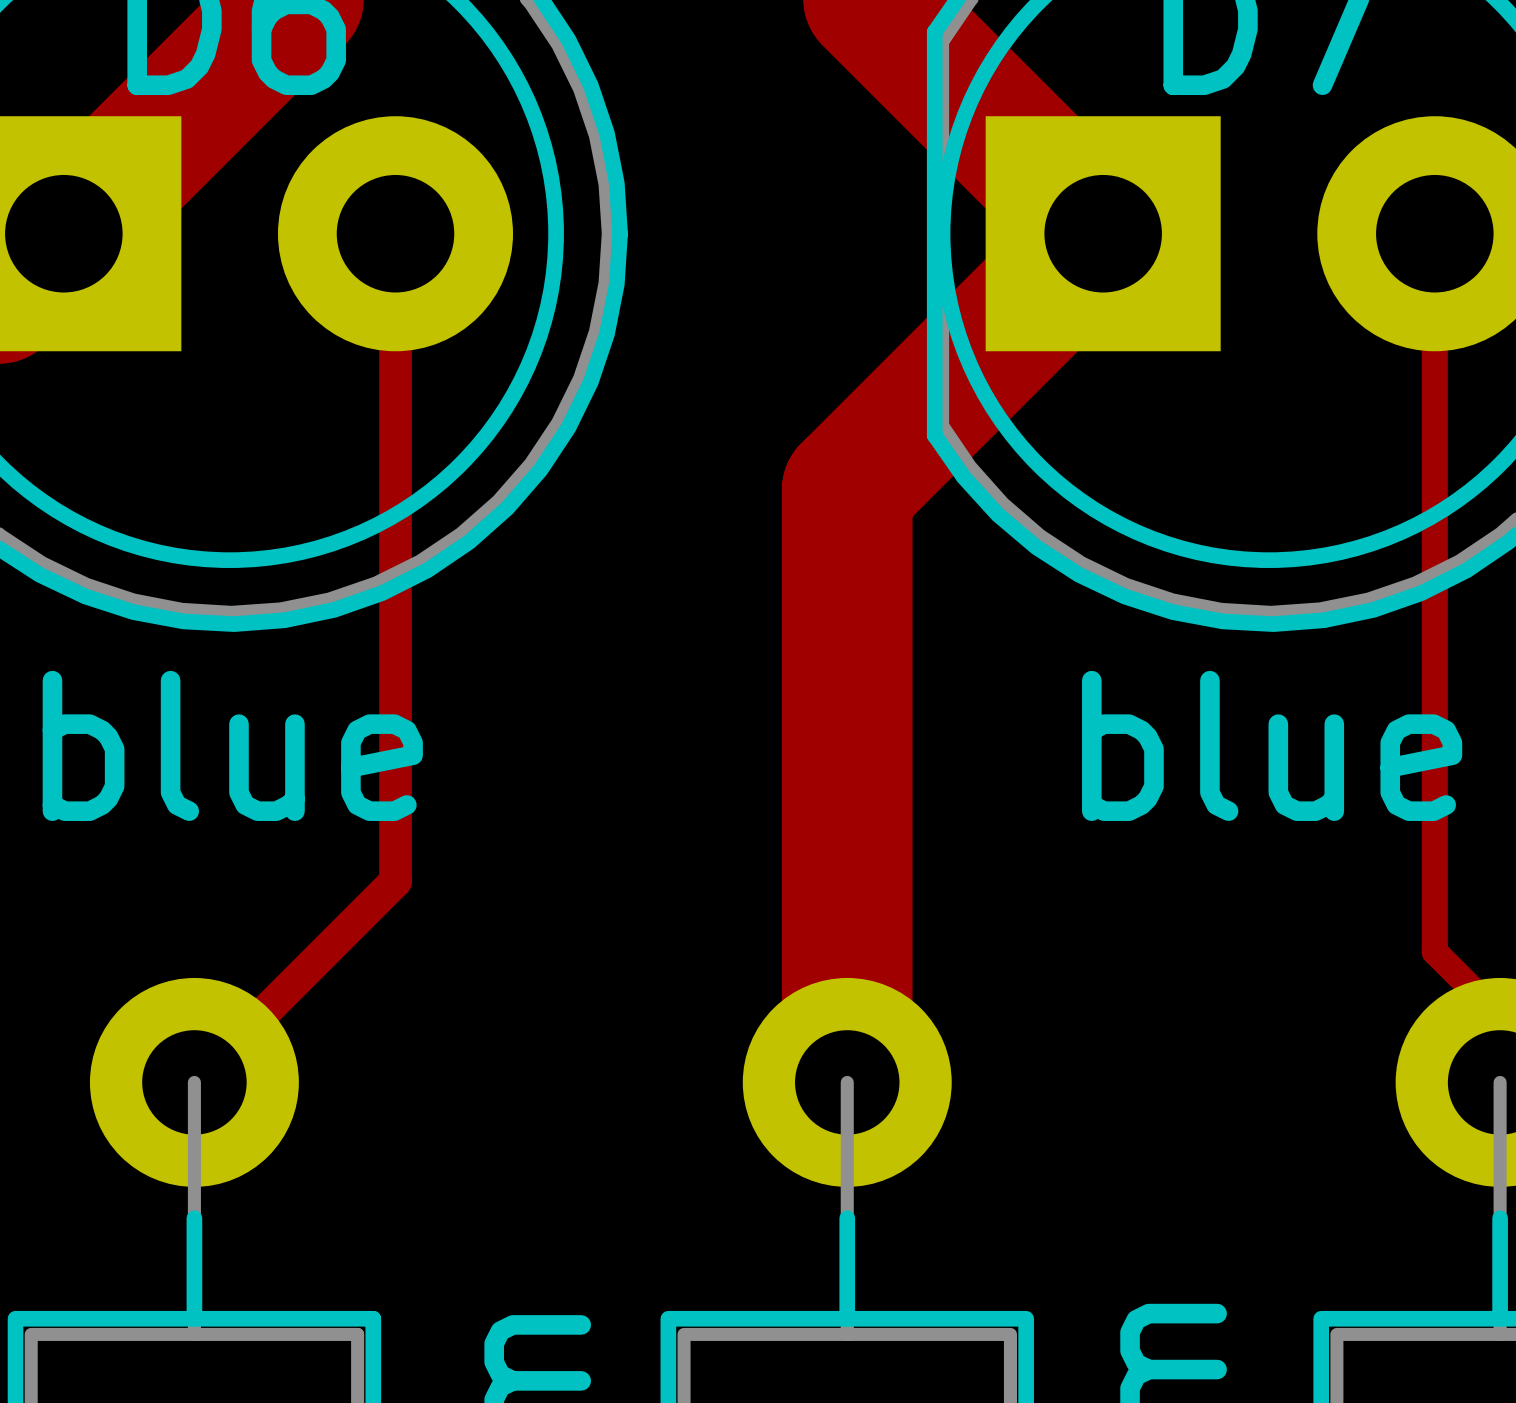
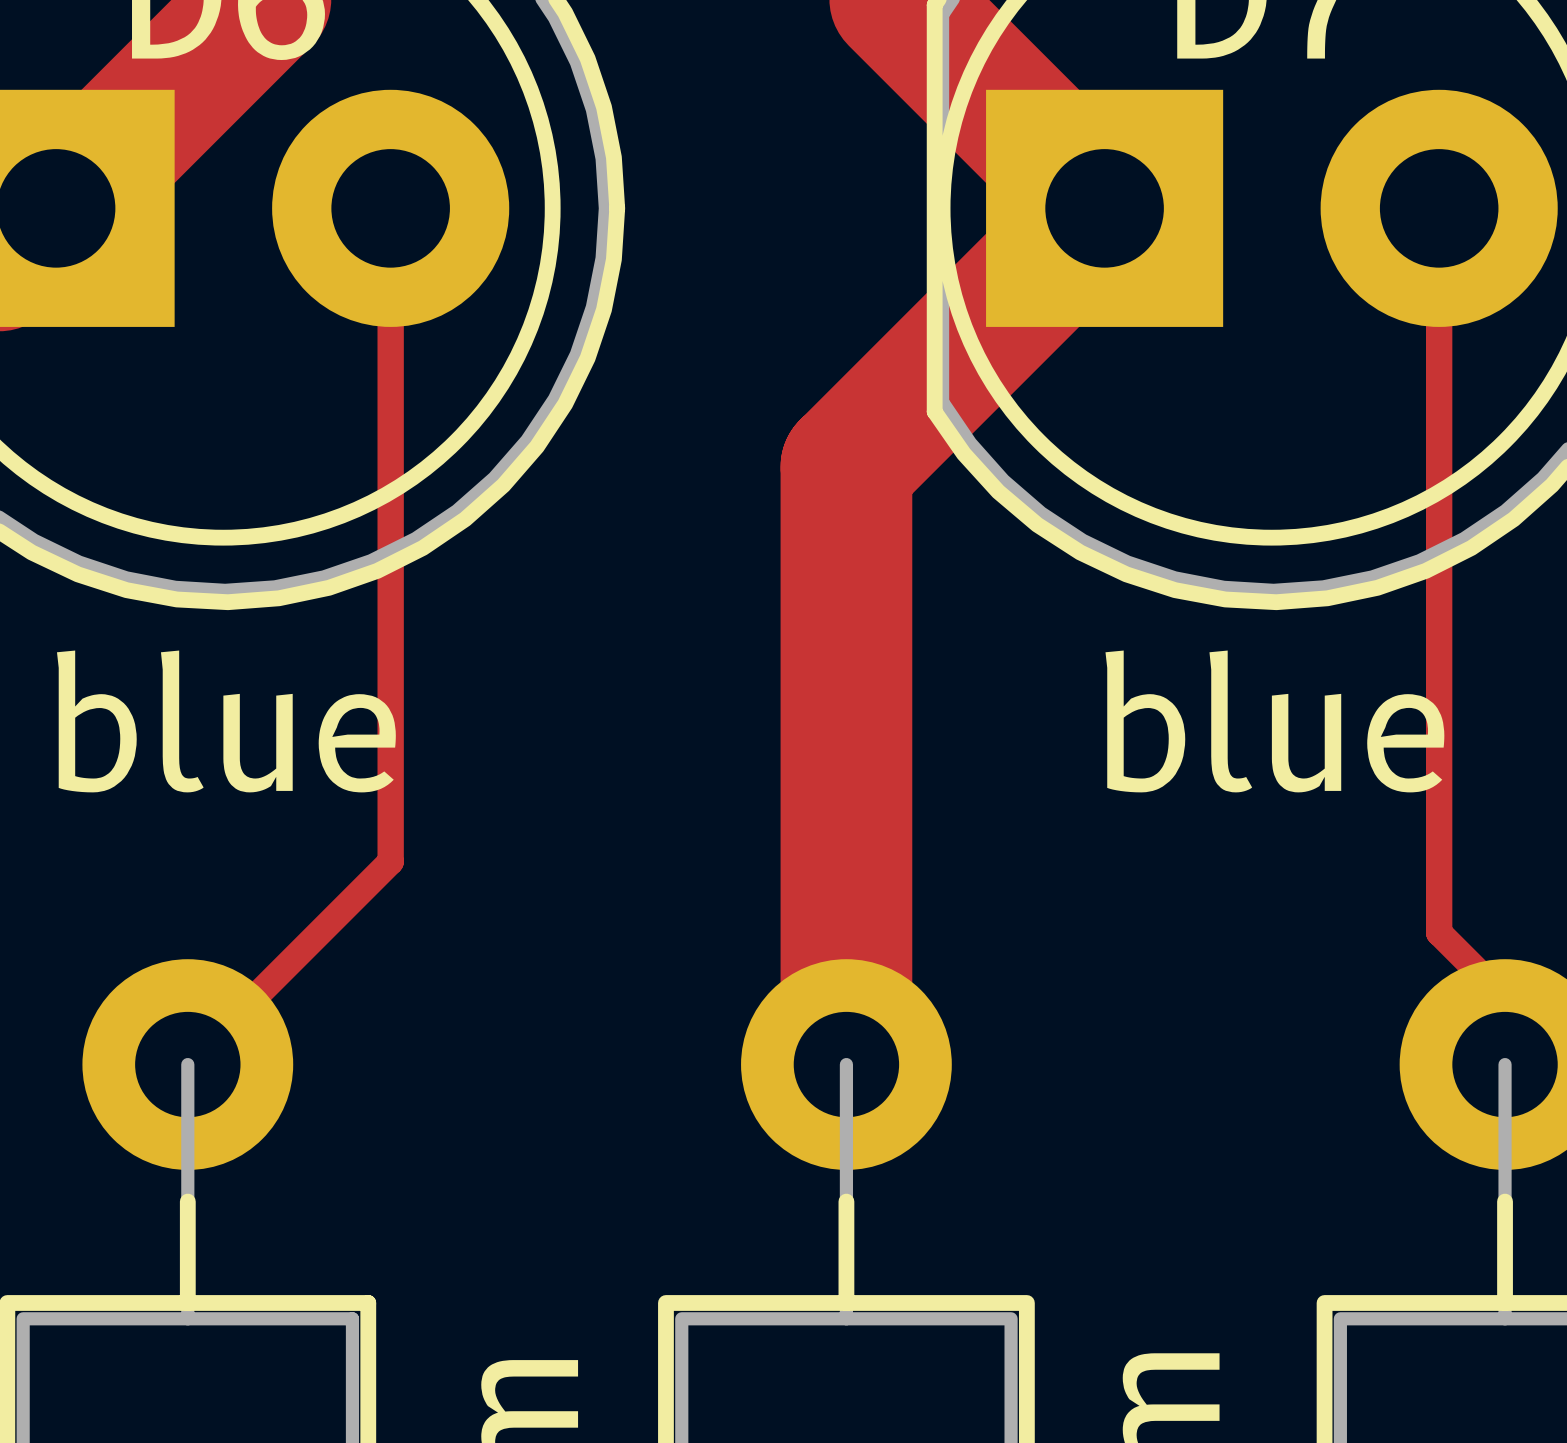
top track width: thick (395, 233) (395, 881) (194, 1082) -> thin (390, 208) (390, 861) (187, 1064)

